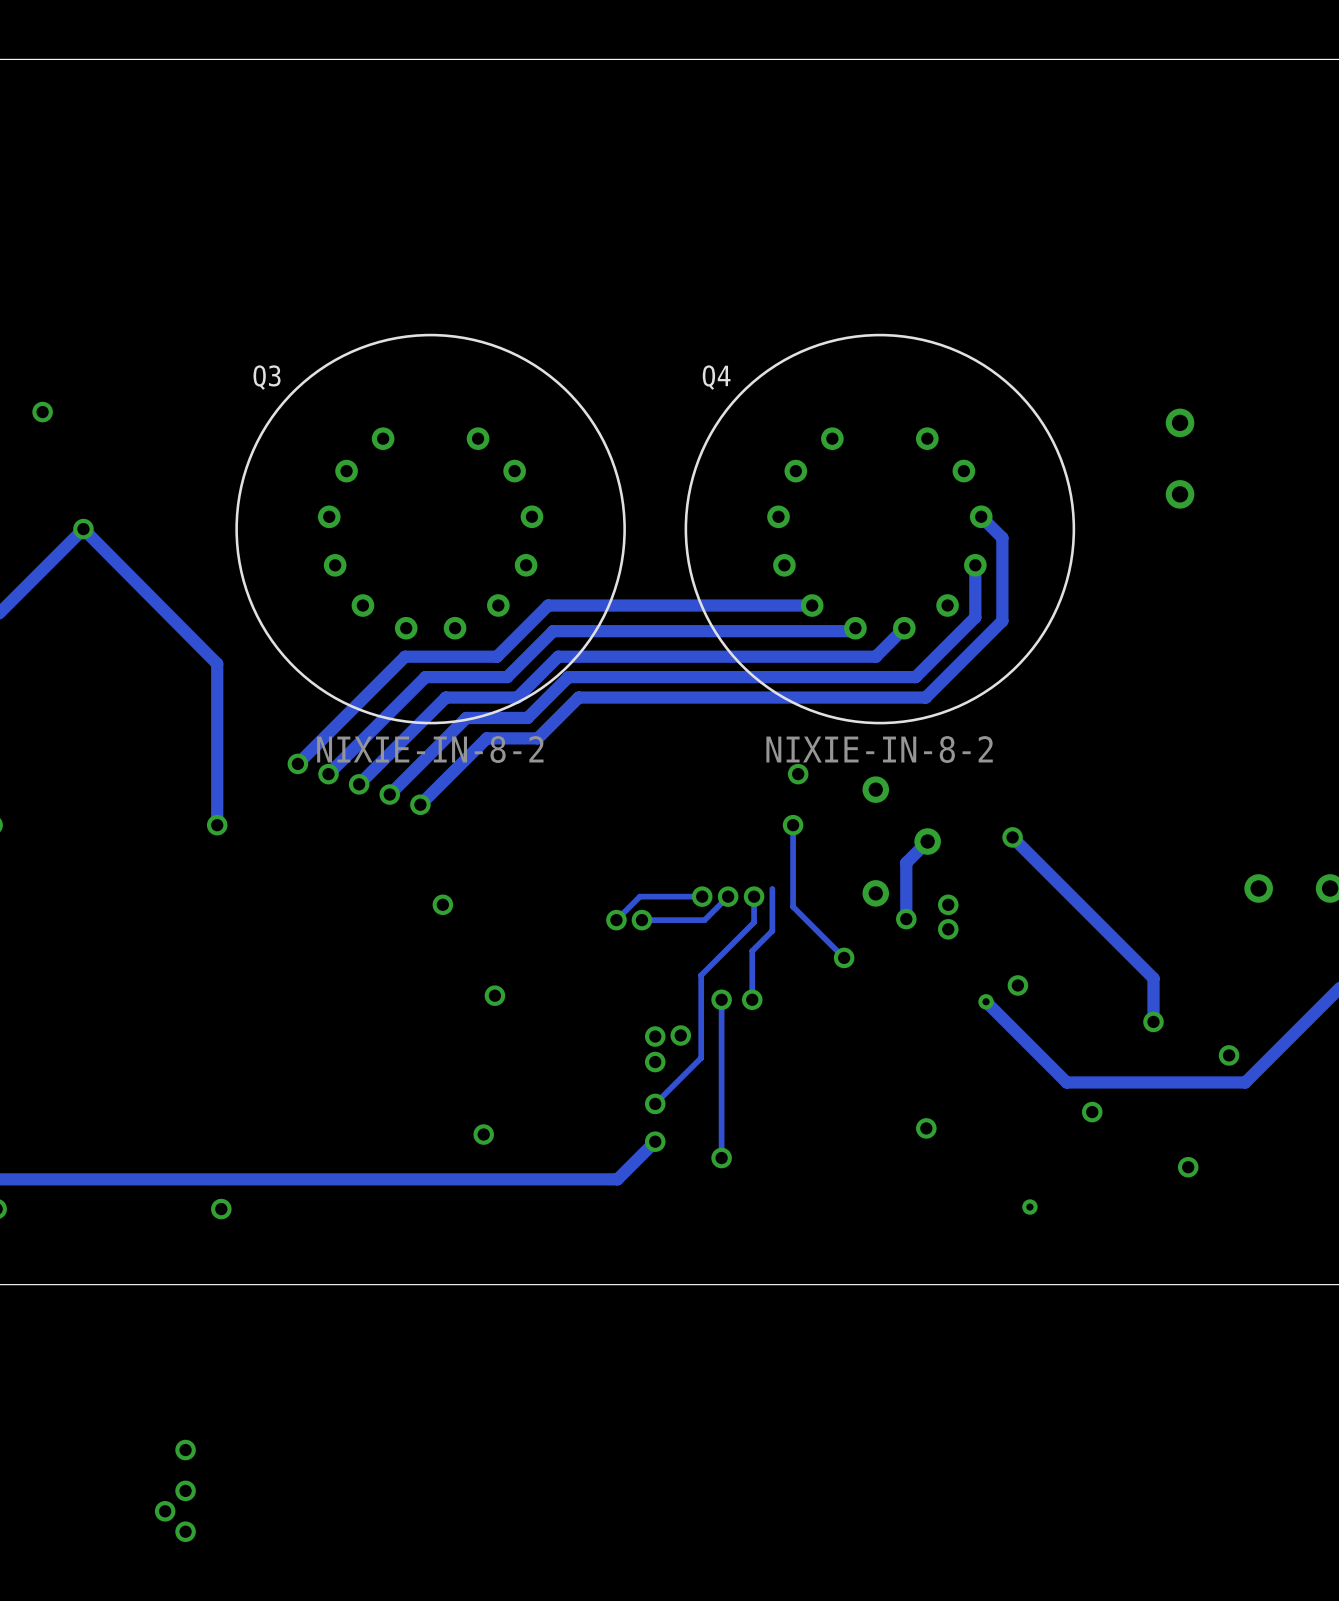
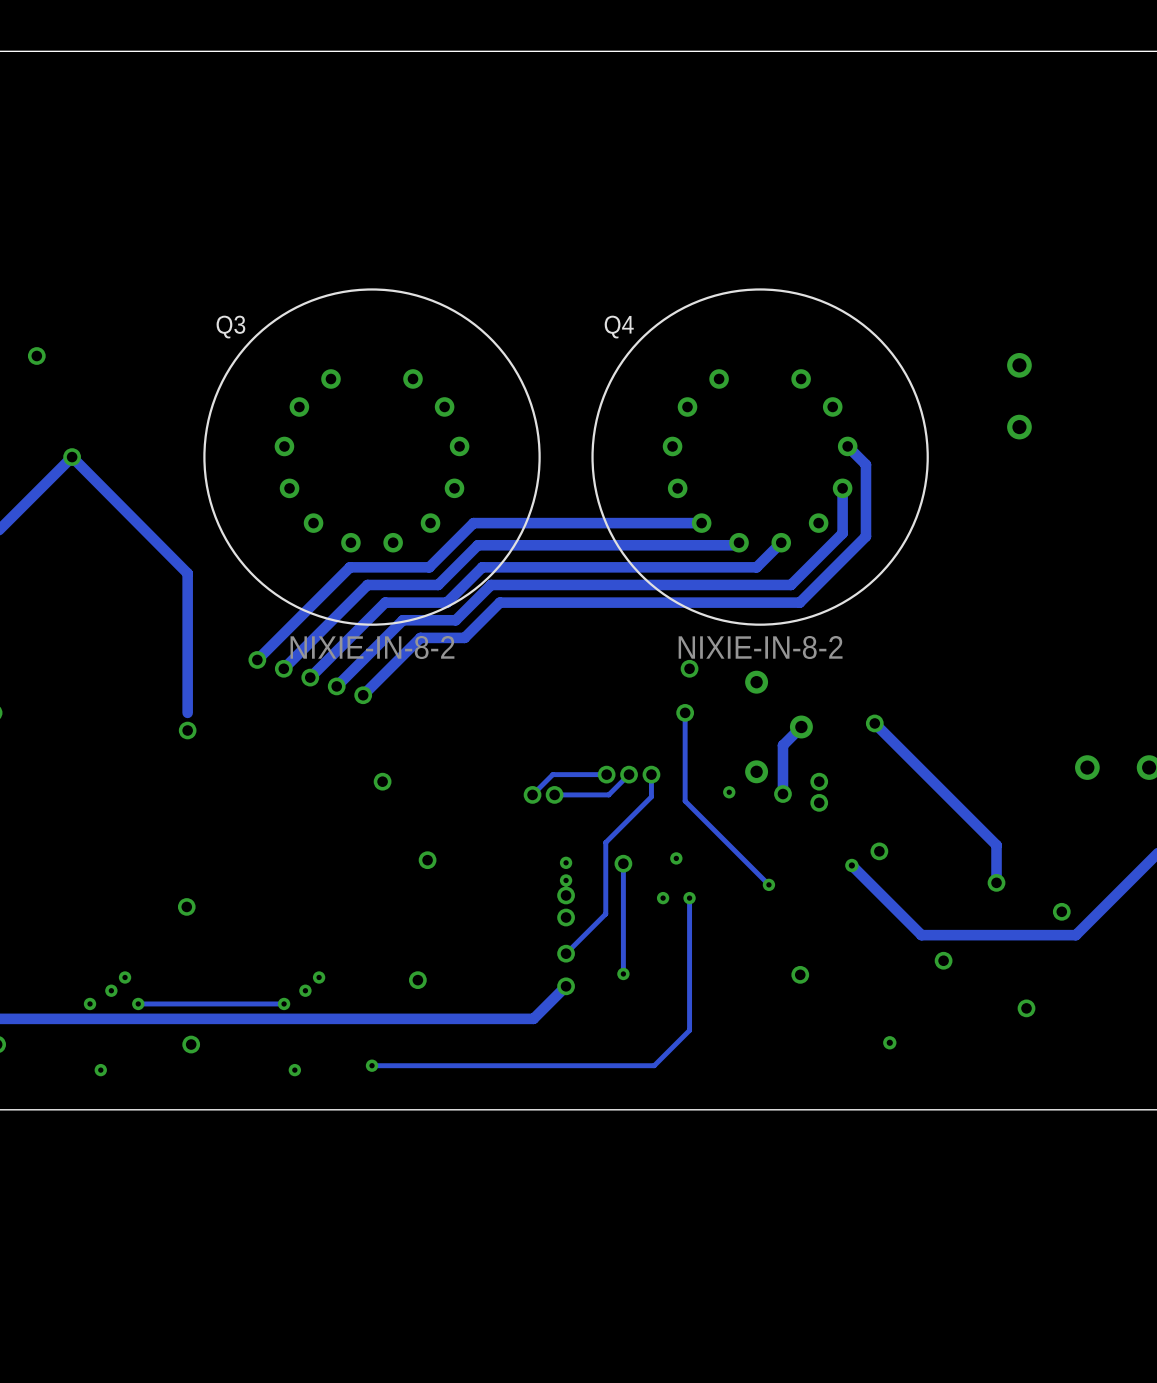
via position: (217, 825) -> (187, 730)
track: (772, 888) (772, 930) (752, 950) (752, 999) -> none
track: (793, 906) (844, 957) -> (685, 783) (685, 801) (768, 884)
via: none -> (729, 792)
via: (844, 957) -> none
via: none -> (676, 858)
via: none -> (566, 862)
via: (752, 999) -> none
via: none -> (566, 880)
via: none -> (768, 884)
via: (680, 1035) -> none
via: none -> (663, 898)
track: none -> (689, 898) (689, 1030) (654, 1065) (372, 1065)
via: none -> (689, 898)
via: none -> (186, 906)
track: (721, 1127) (721, 1158) -> none
via: none -> (623, 973)
via: none -> (125, 977)
via: none -> (319, 977)
via: none -> (111, 990)
via: none -> (305, 990)
via: (721, 1158) -> none
via: none -> (90, 1003)
via: none -> (138, 1003)
track: none -> (284, 1003) (138, 1003)
via: none -> (284, 1003)
via: none -> (372, 1065)
via: none -> (100, 1070)
via: none -> (294, 1070)
via: (185, 1450) -> none
via: (185, 1490) -> none
via: (165, 1511) -> none
via: (185, 1531) -> none

